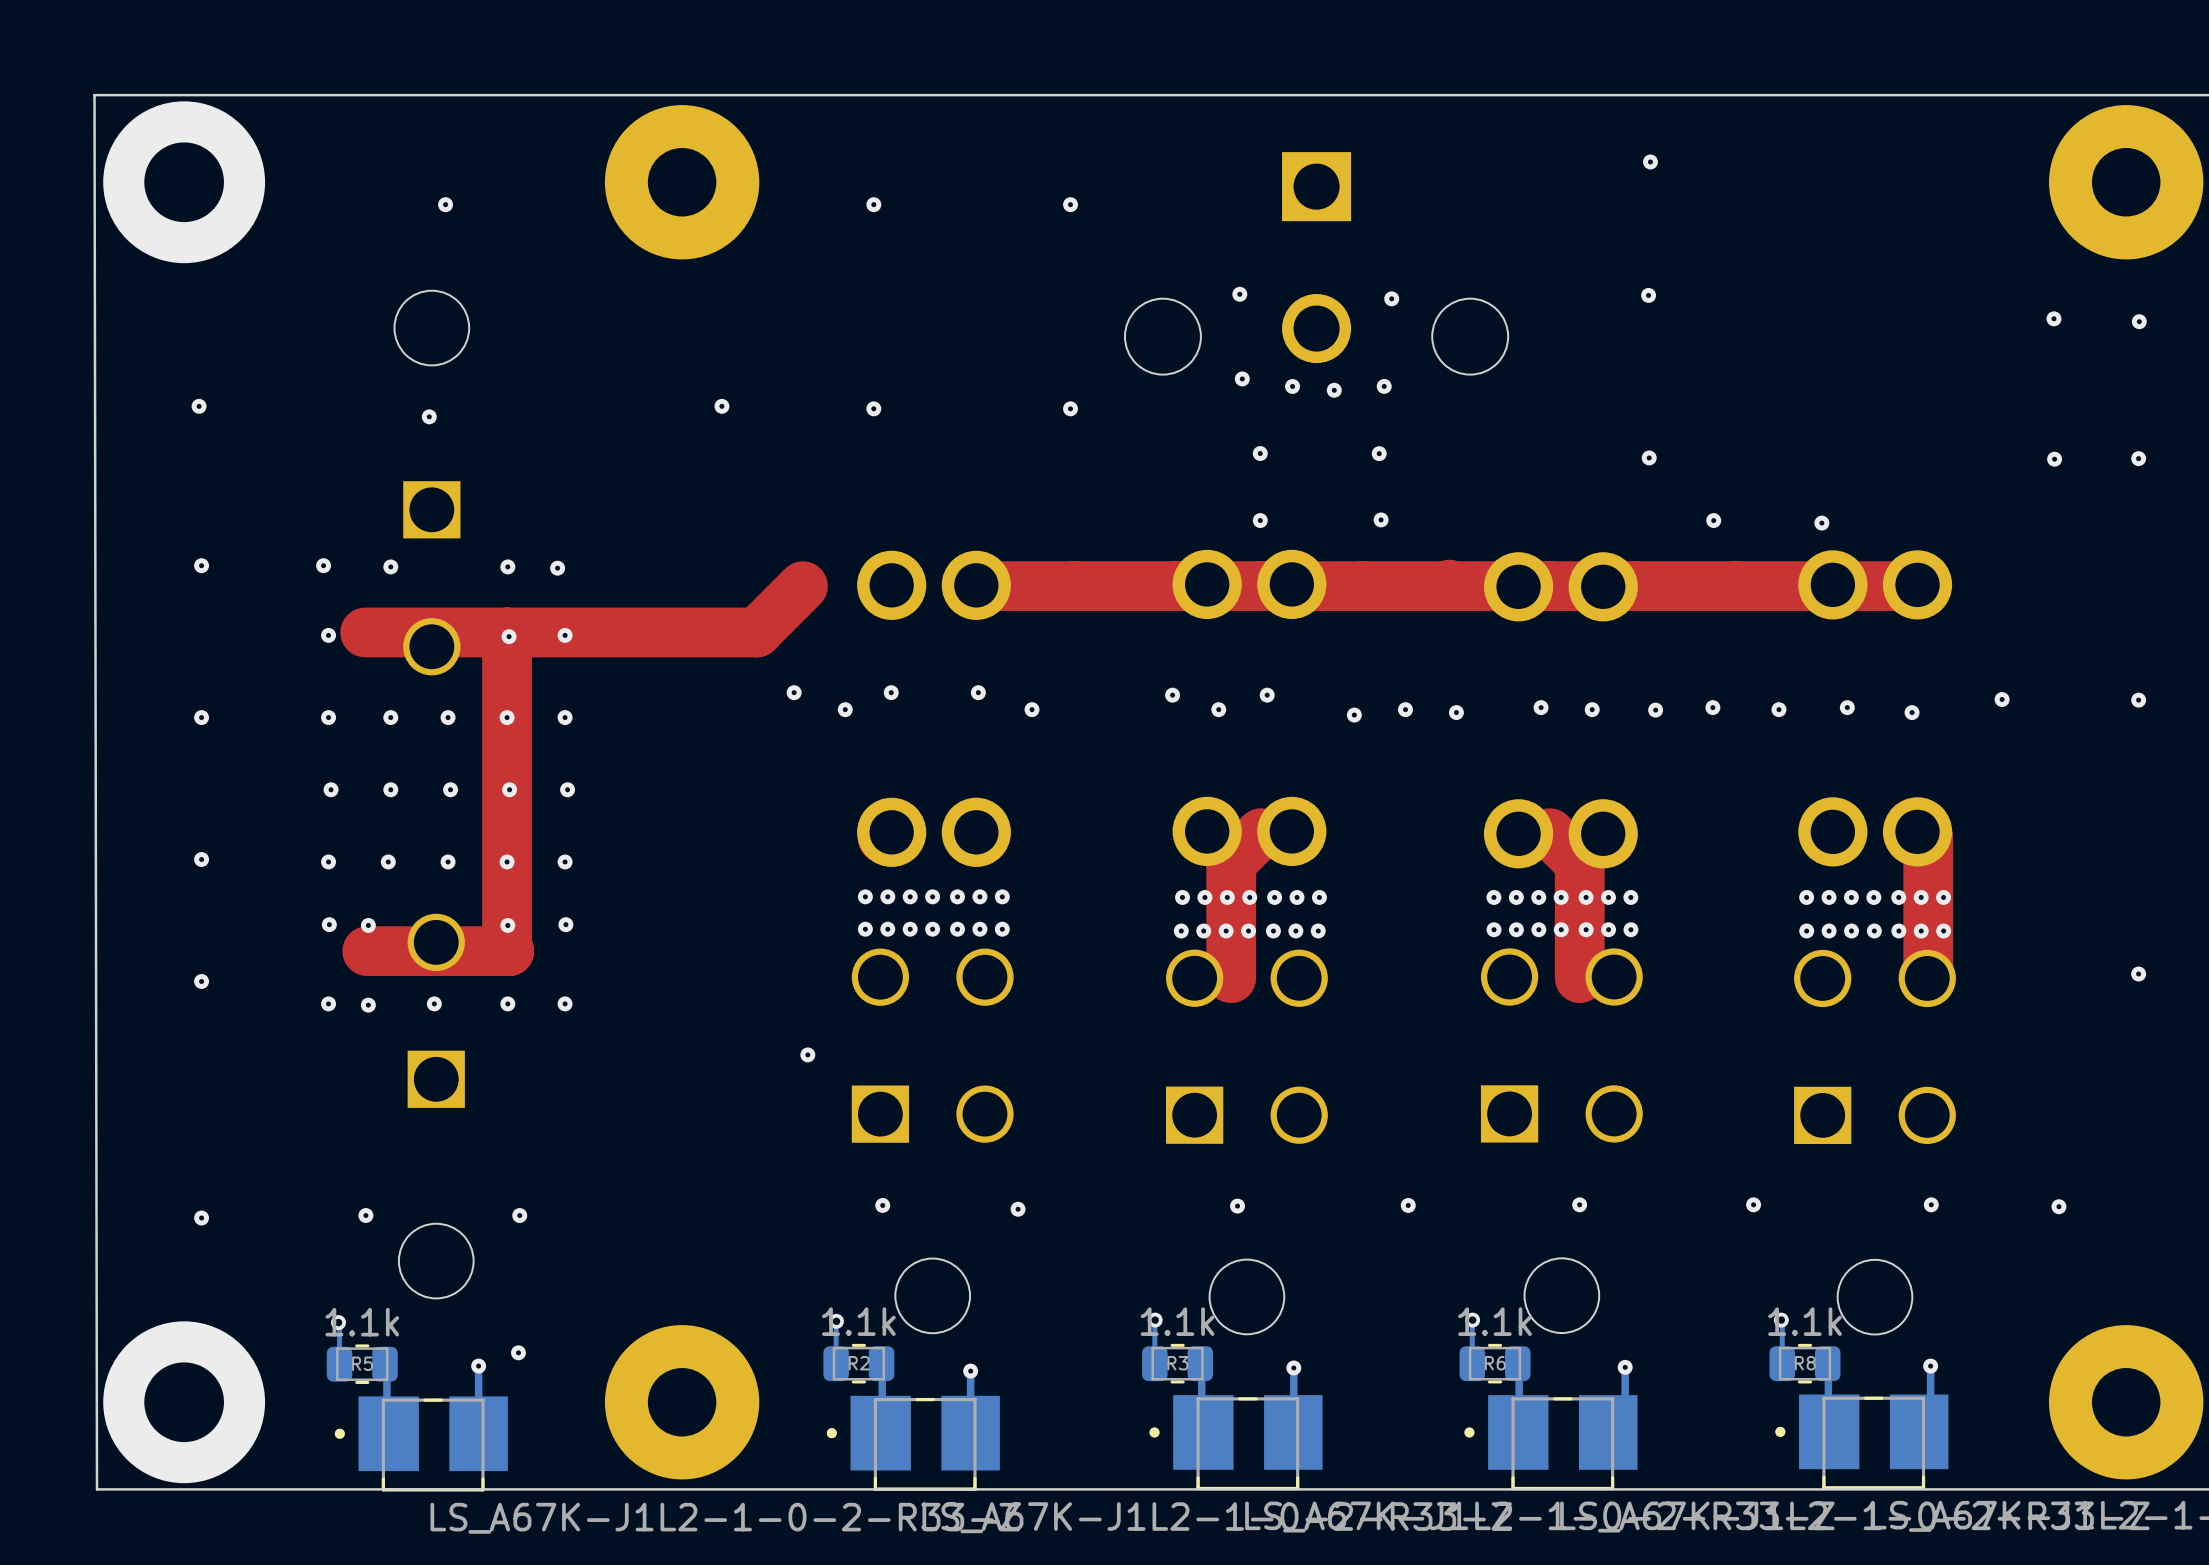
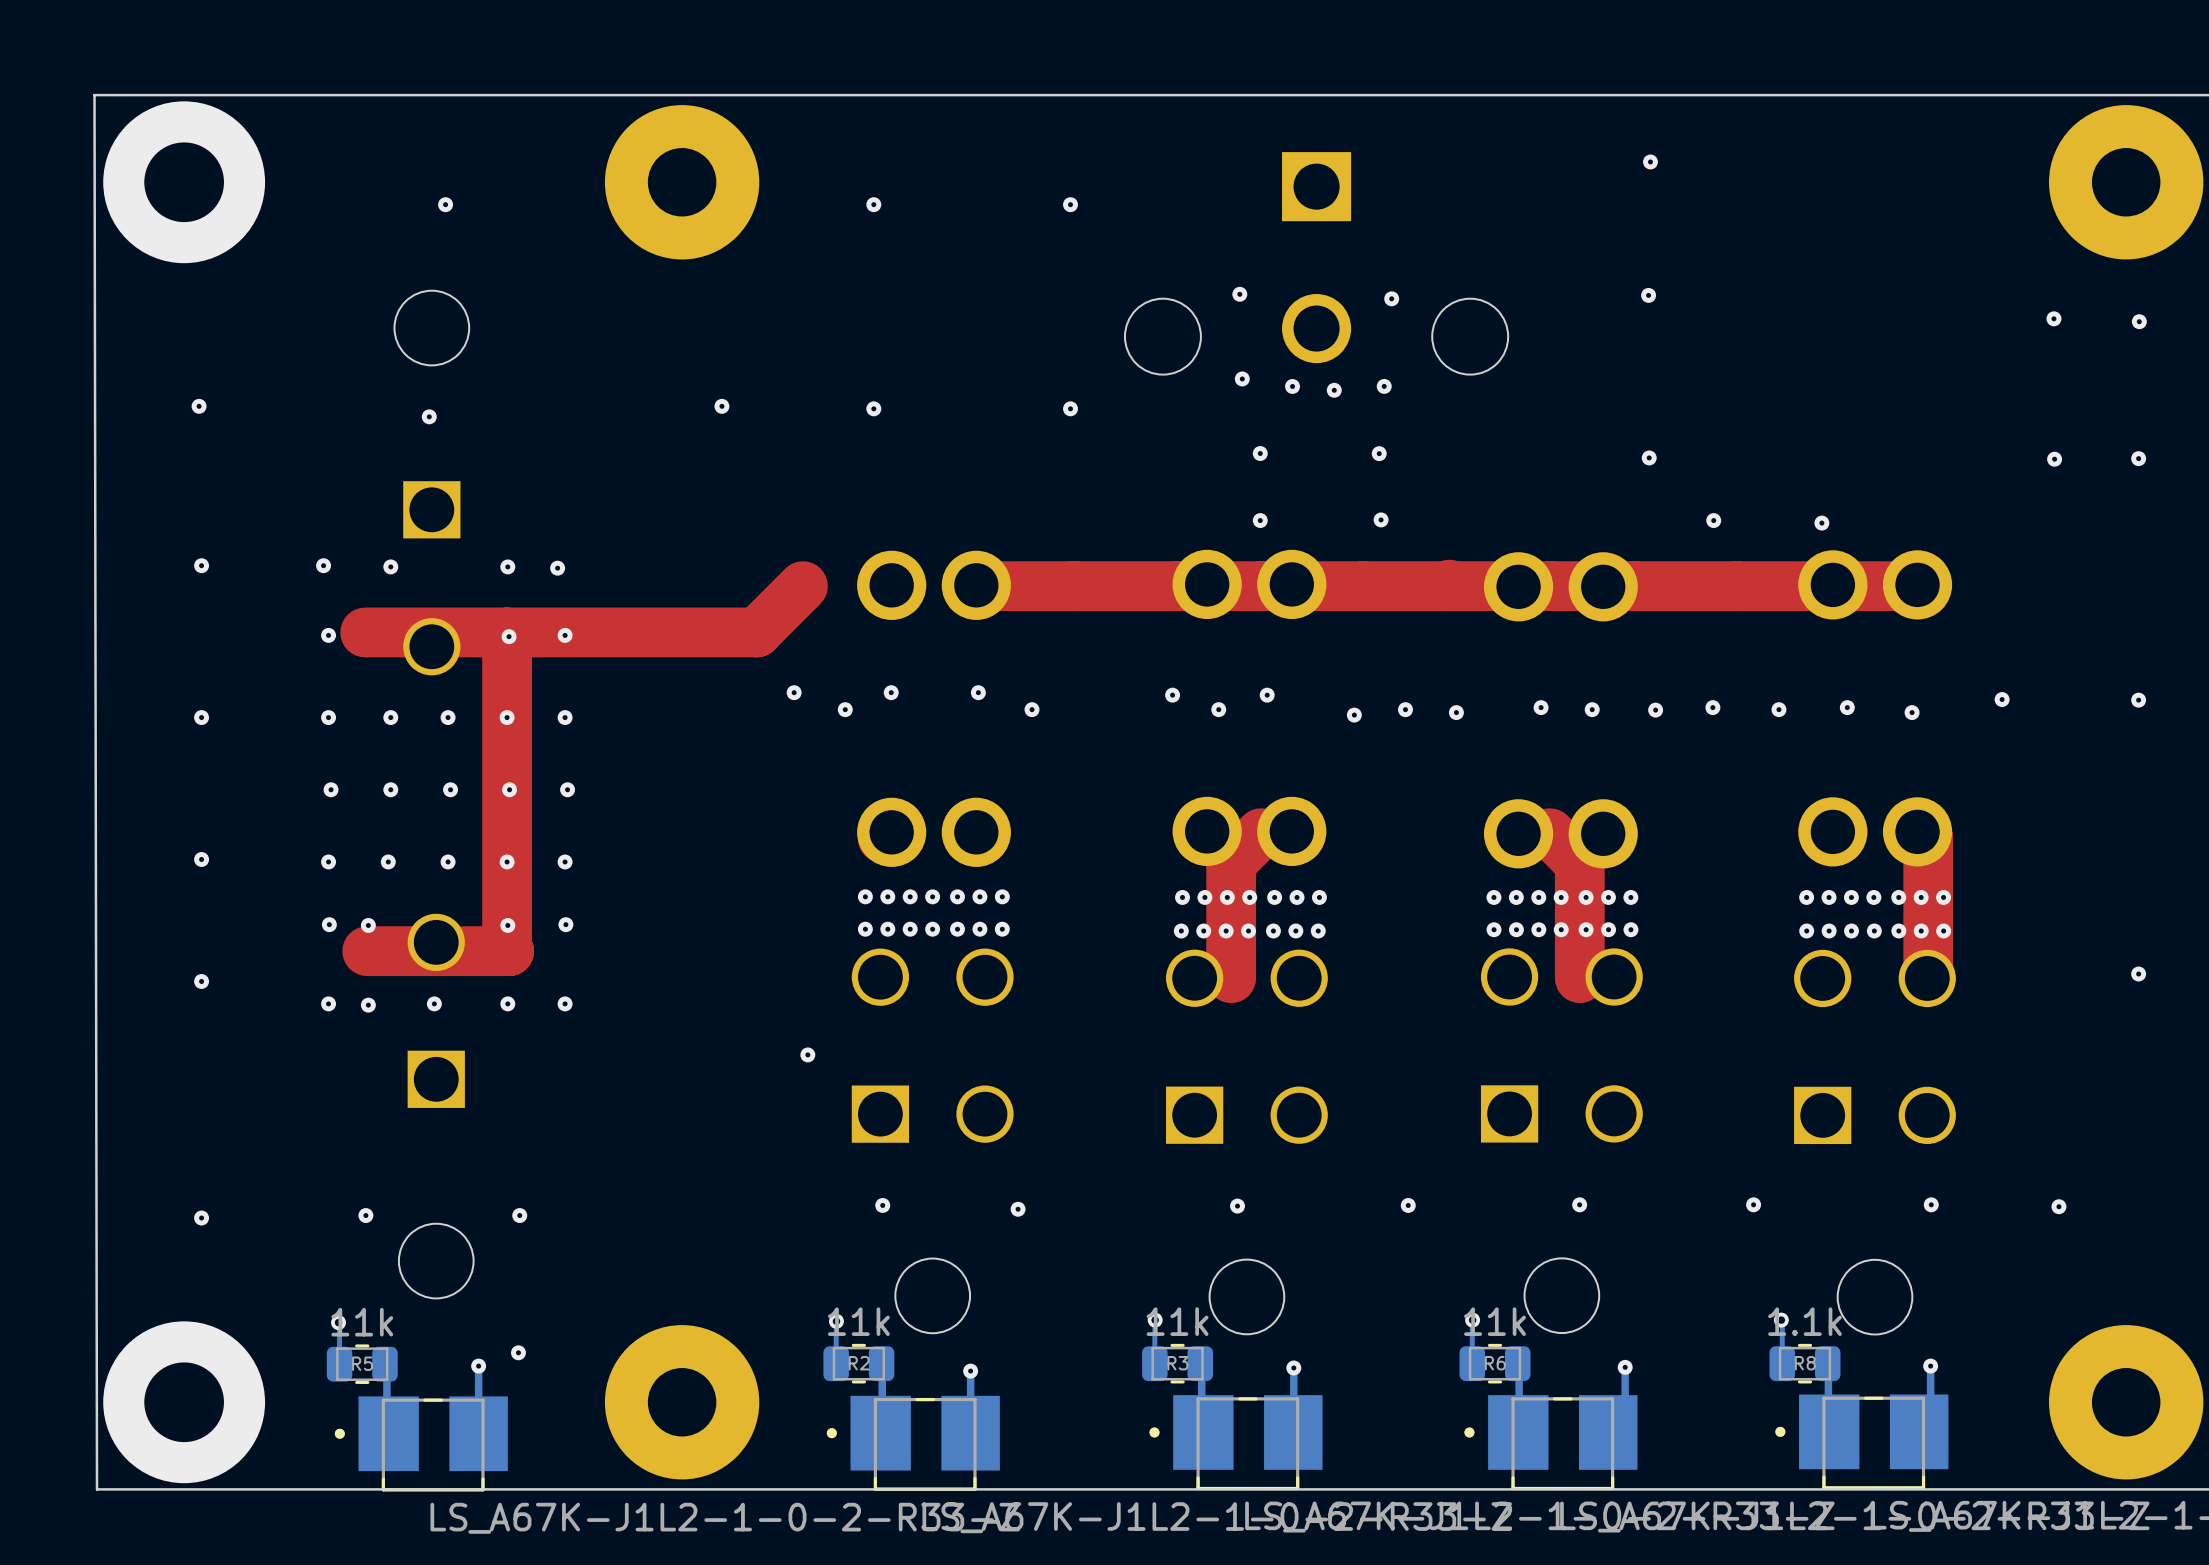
R2 value: 1.1k (858, 1321) -> 11k (858, 1321)
R3 value: 1.1k (1177, 1321) -> 11k (1177, 1321)
R6 value: 1.1k (1495, 1321) -> 11k (1495, 1321)
R5 value: 1.1k (362, 1322) -> 11k (362, 1322)

